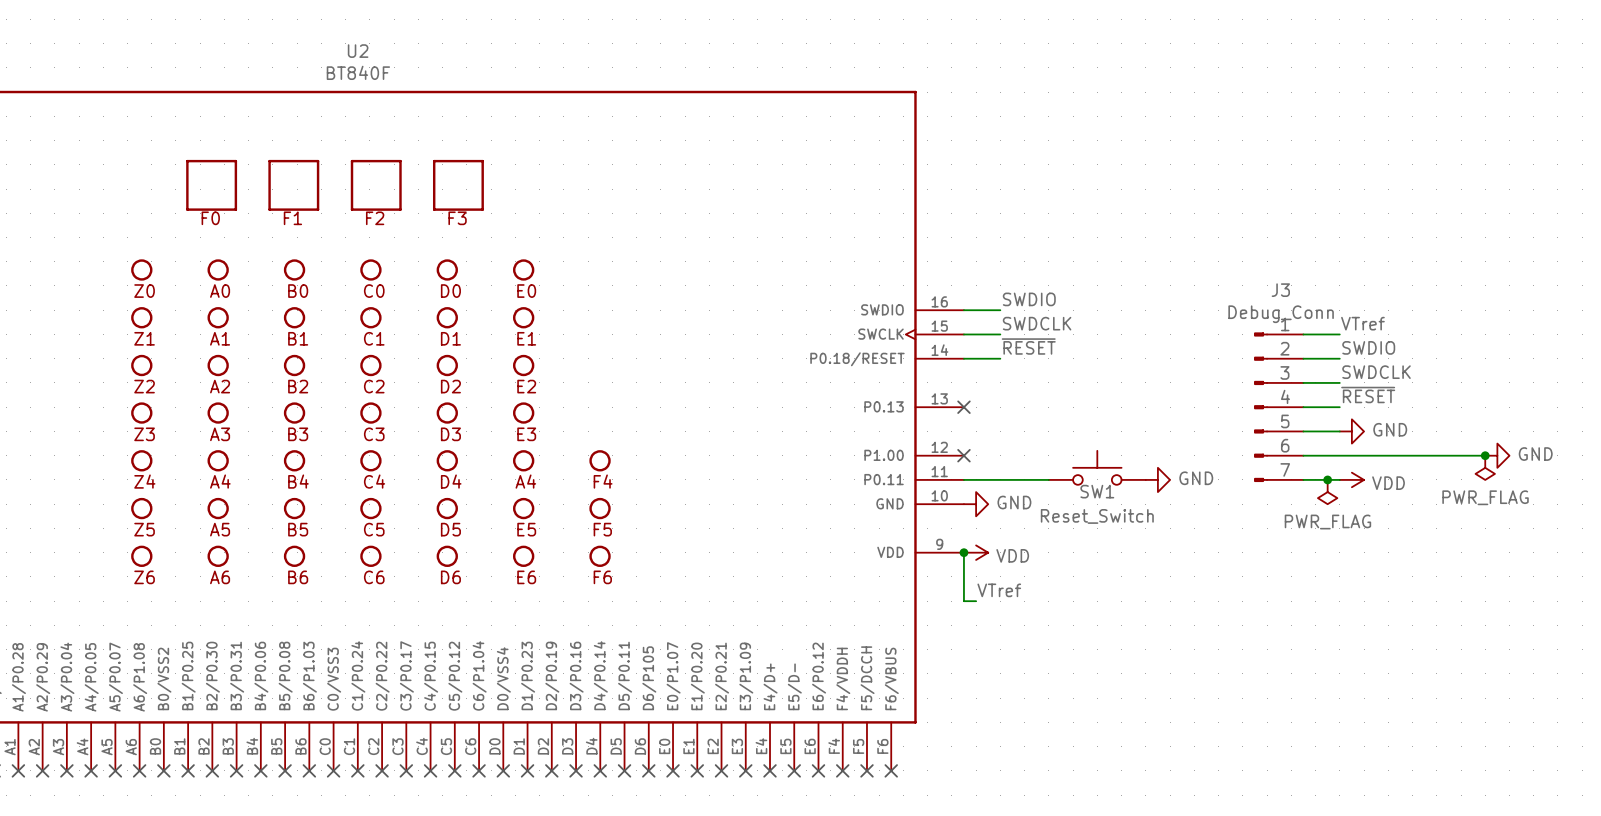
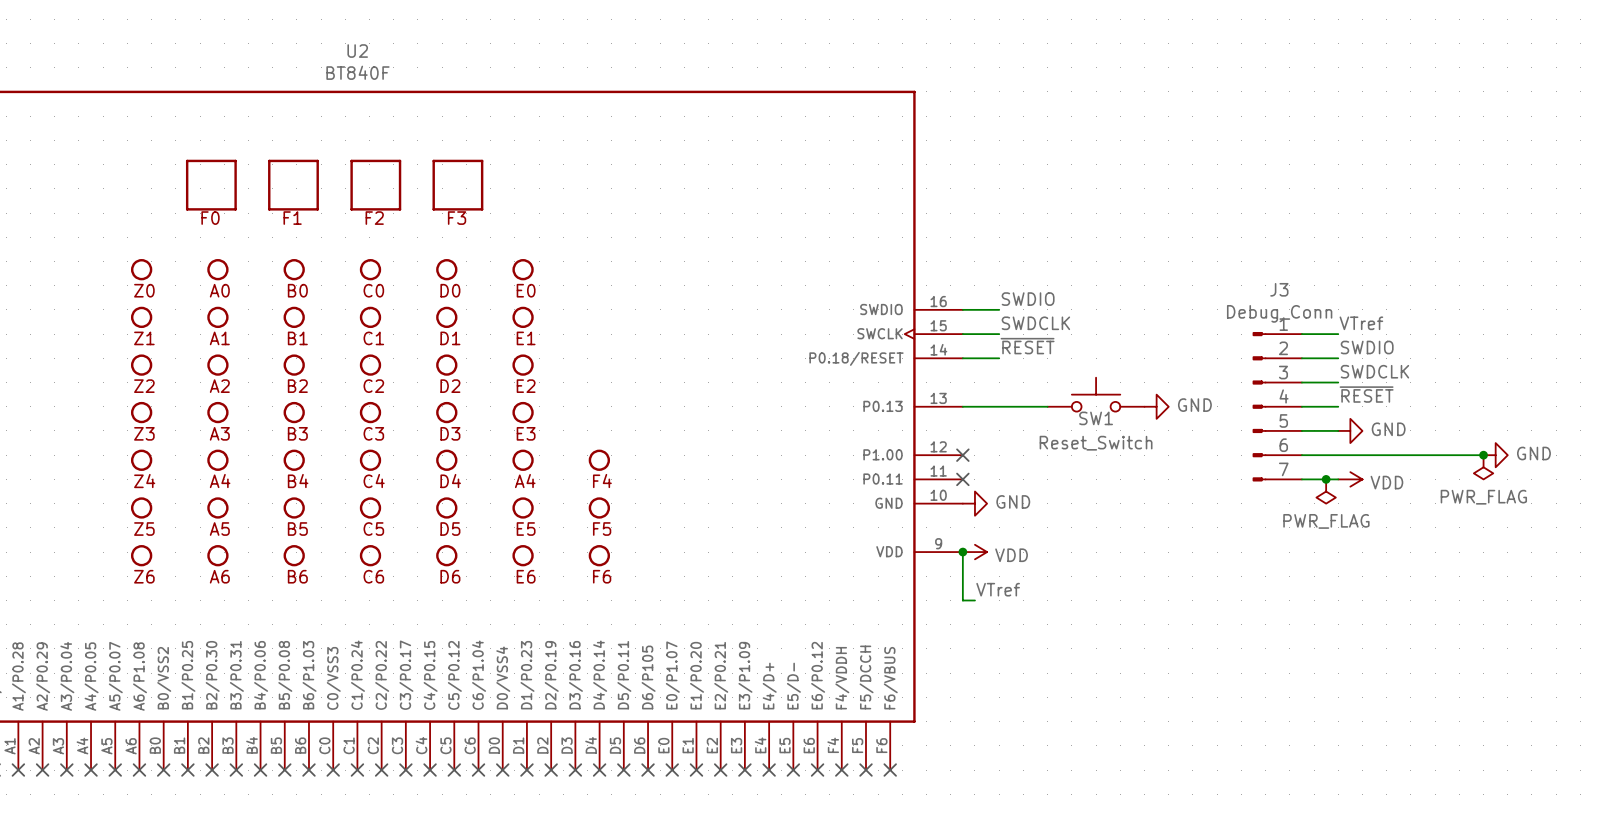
no-connect mark: (963, 407) -> none
SW1 position: (1097, 467) -> (1096, 394)
wire: (963, 479) (1048, 479) -> (962, 406) (1047, 406)
no-connect mark: none -> (962, 479)
power symbol position: GND (1157, 479) -> GND (1156, 406)

